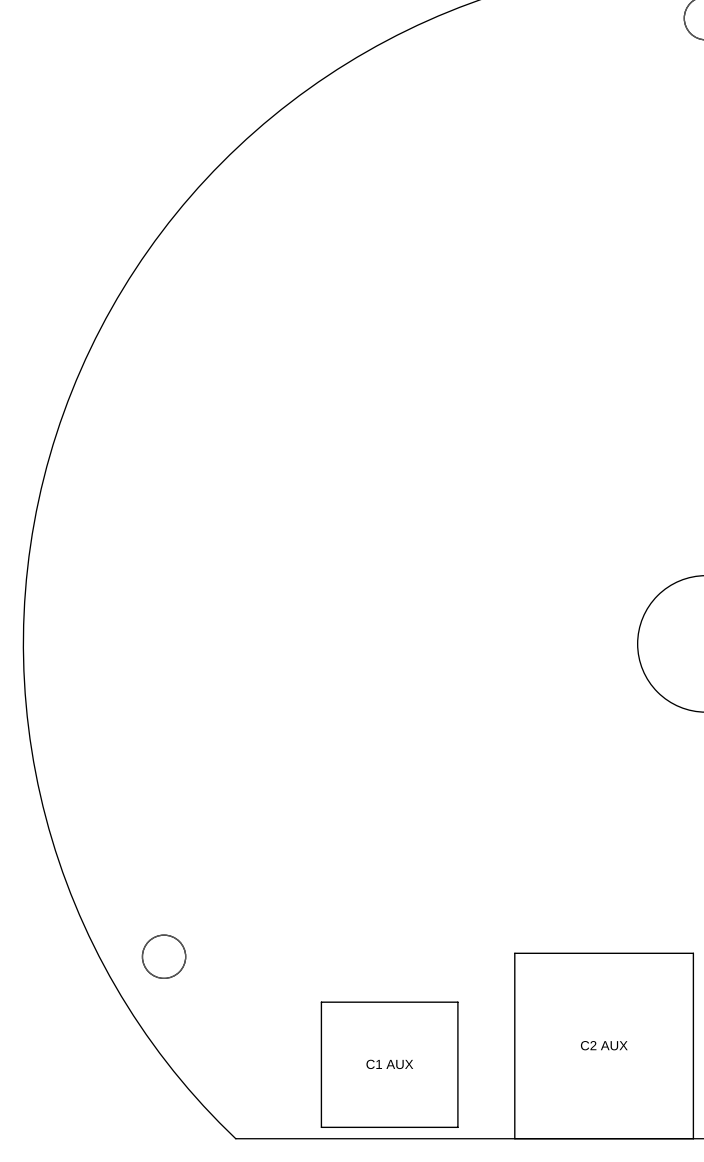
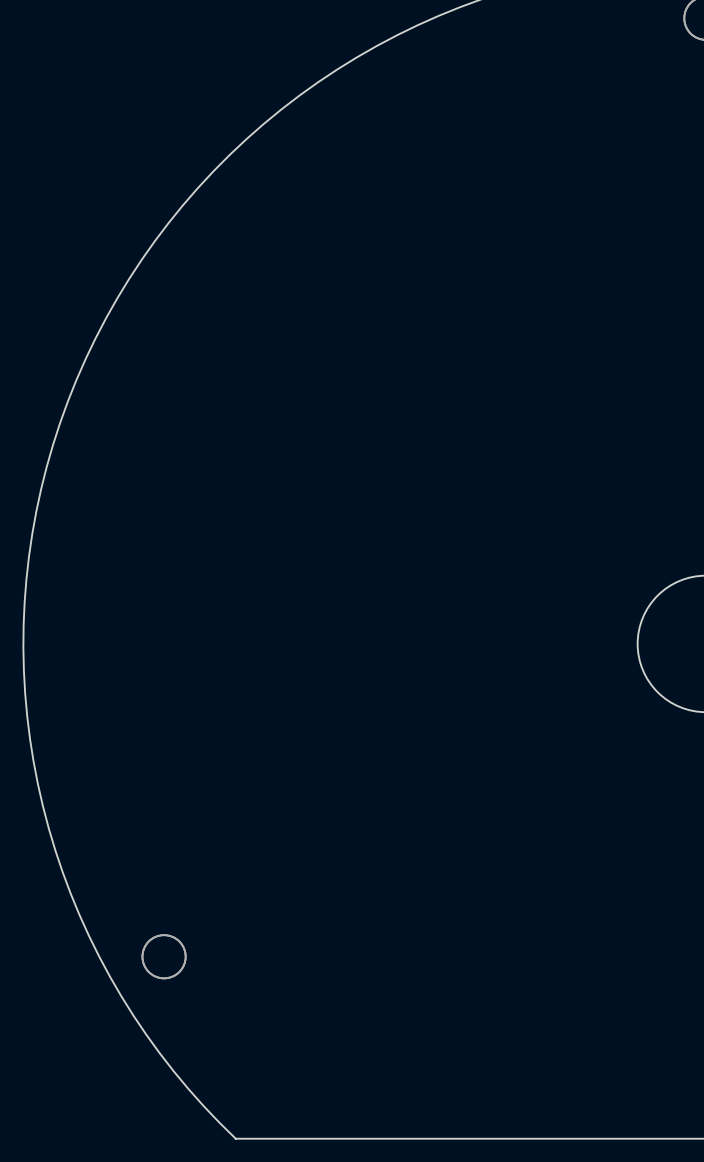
line: (514, 953) (693, 953) (693, 1138) (514, 1138) (514, 953) -> none
line: (321, 1002) (457, 1002) (457, 1127) (321, 1127) (321, 1002) -> none
text: C2 AUX (604, 1045) -> none
text: C1 AUX (389, 1064) -> none

